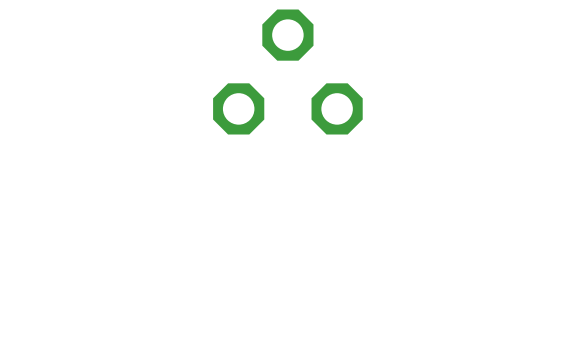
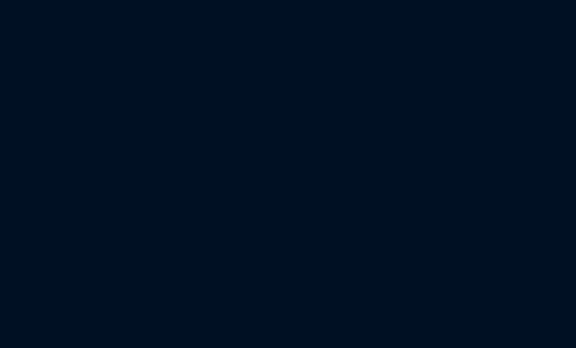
part: (287, 72) -> none

